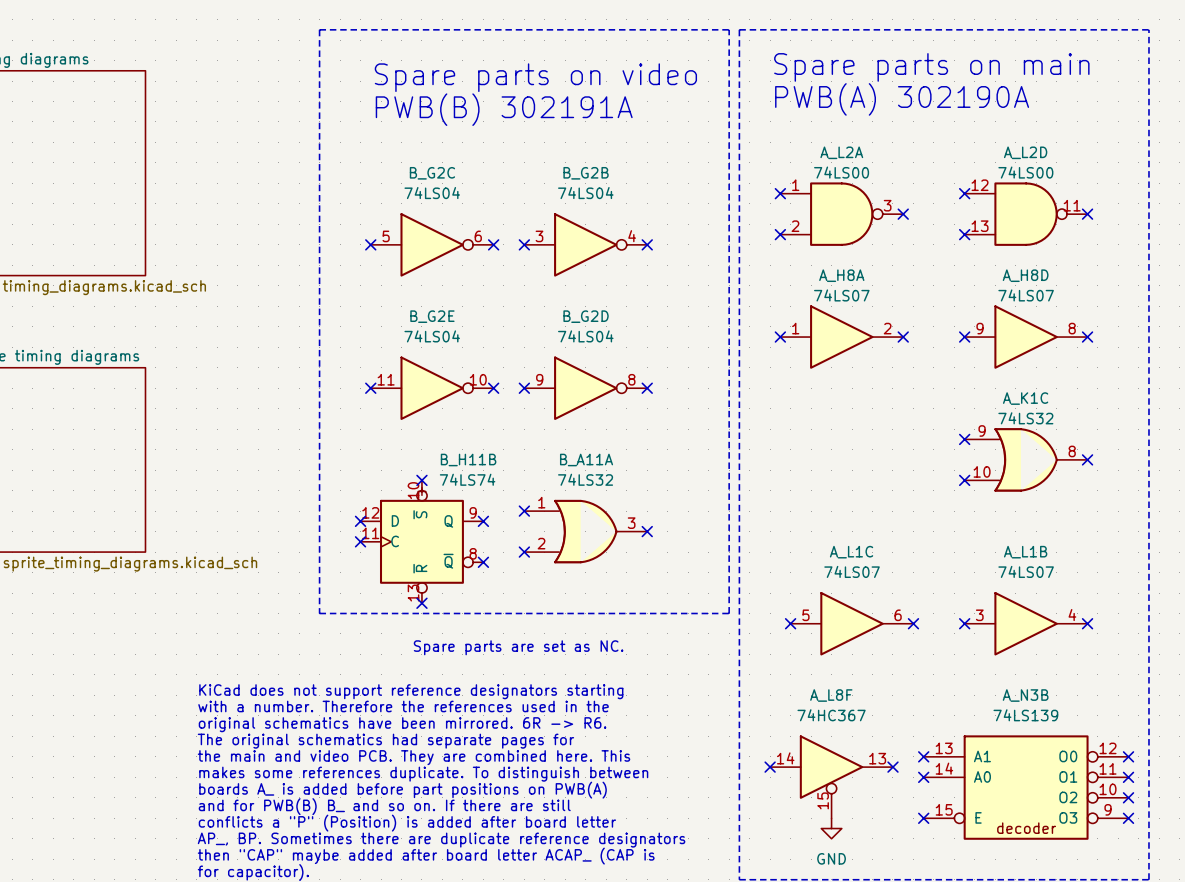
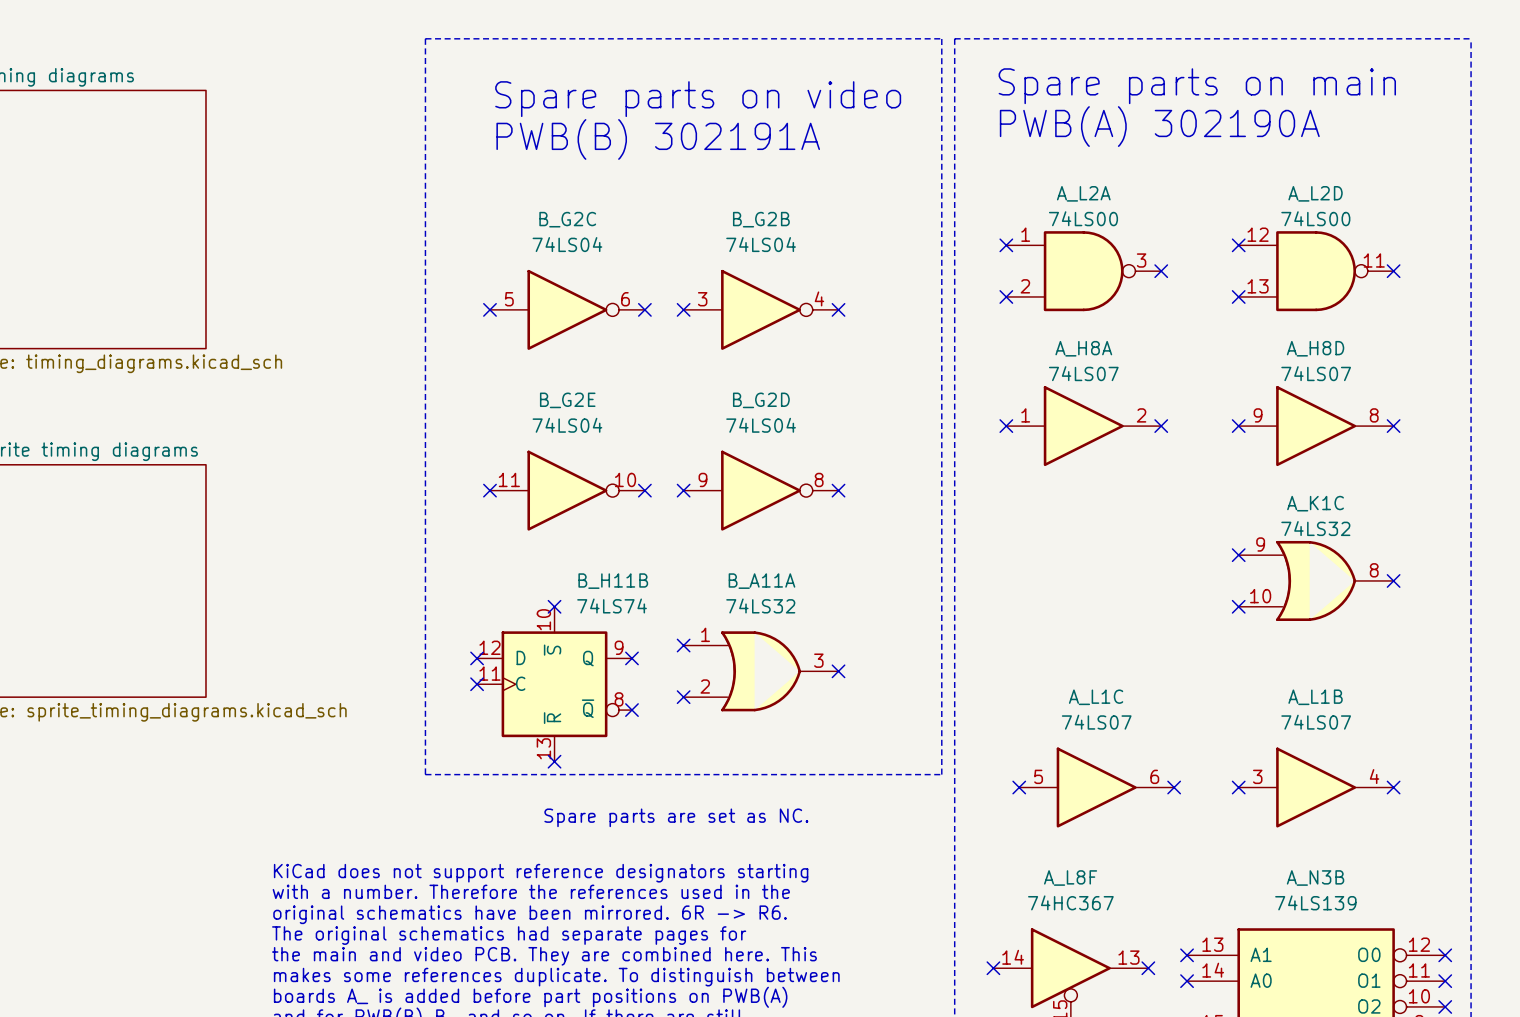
B_H11B symbol: [360, 480, 484, 604] -> [477, 606, 632, 762]

